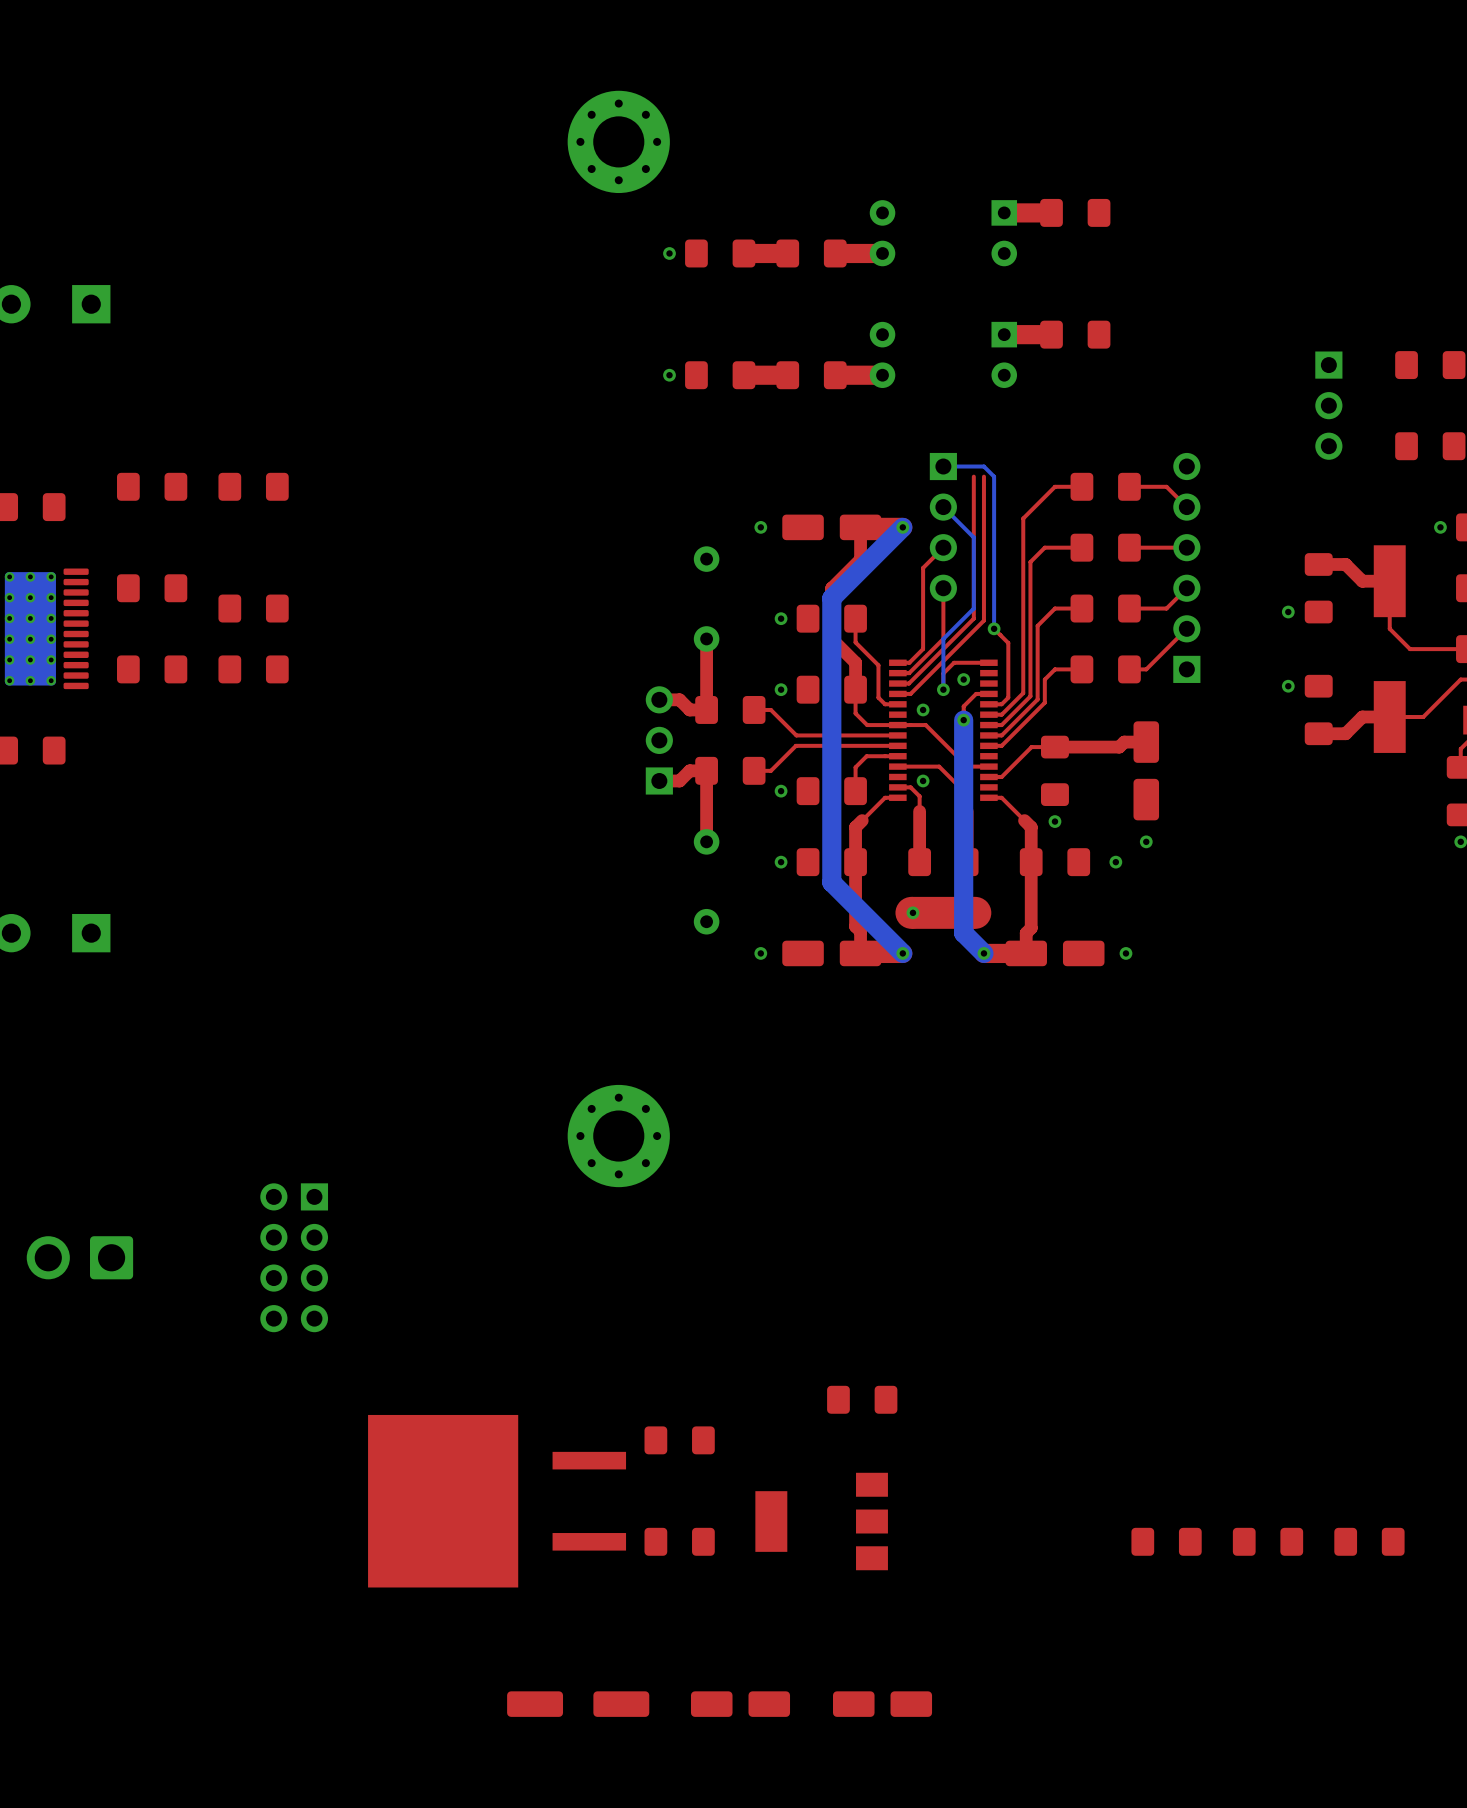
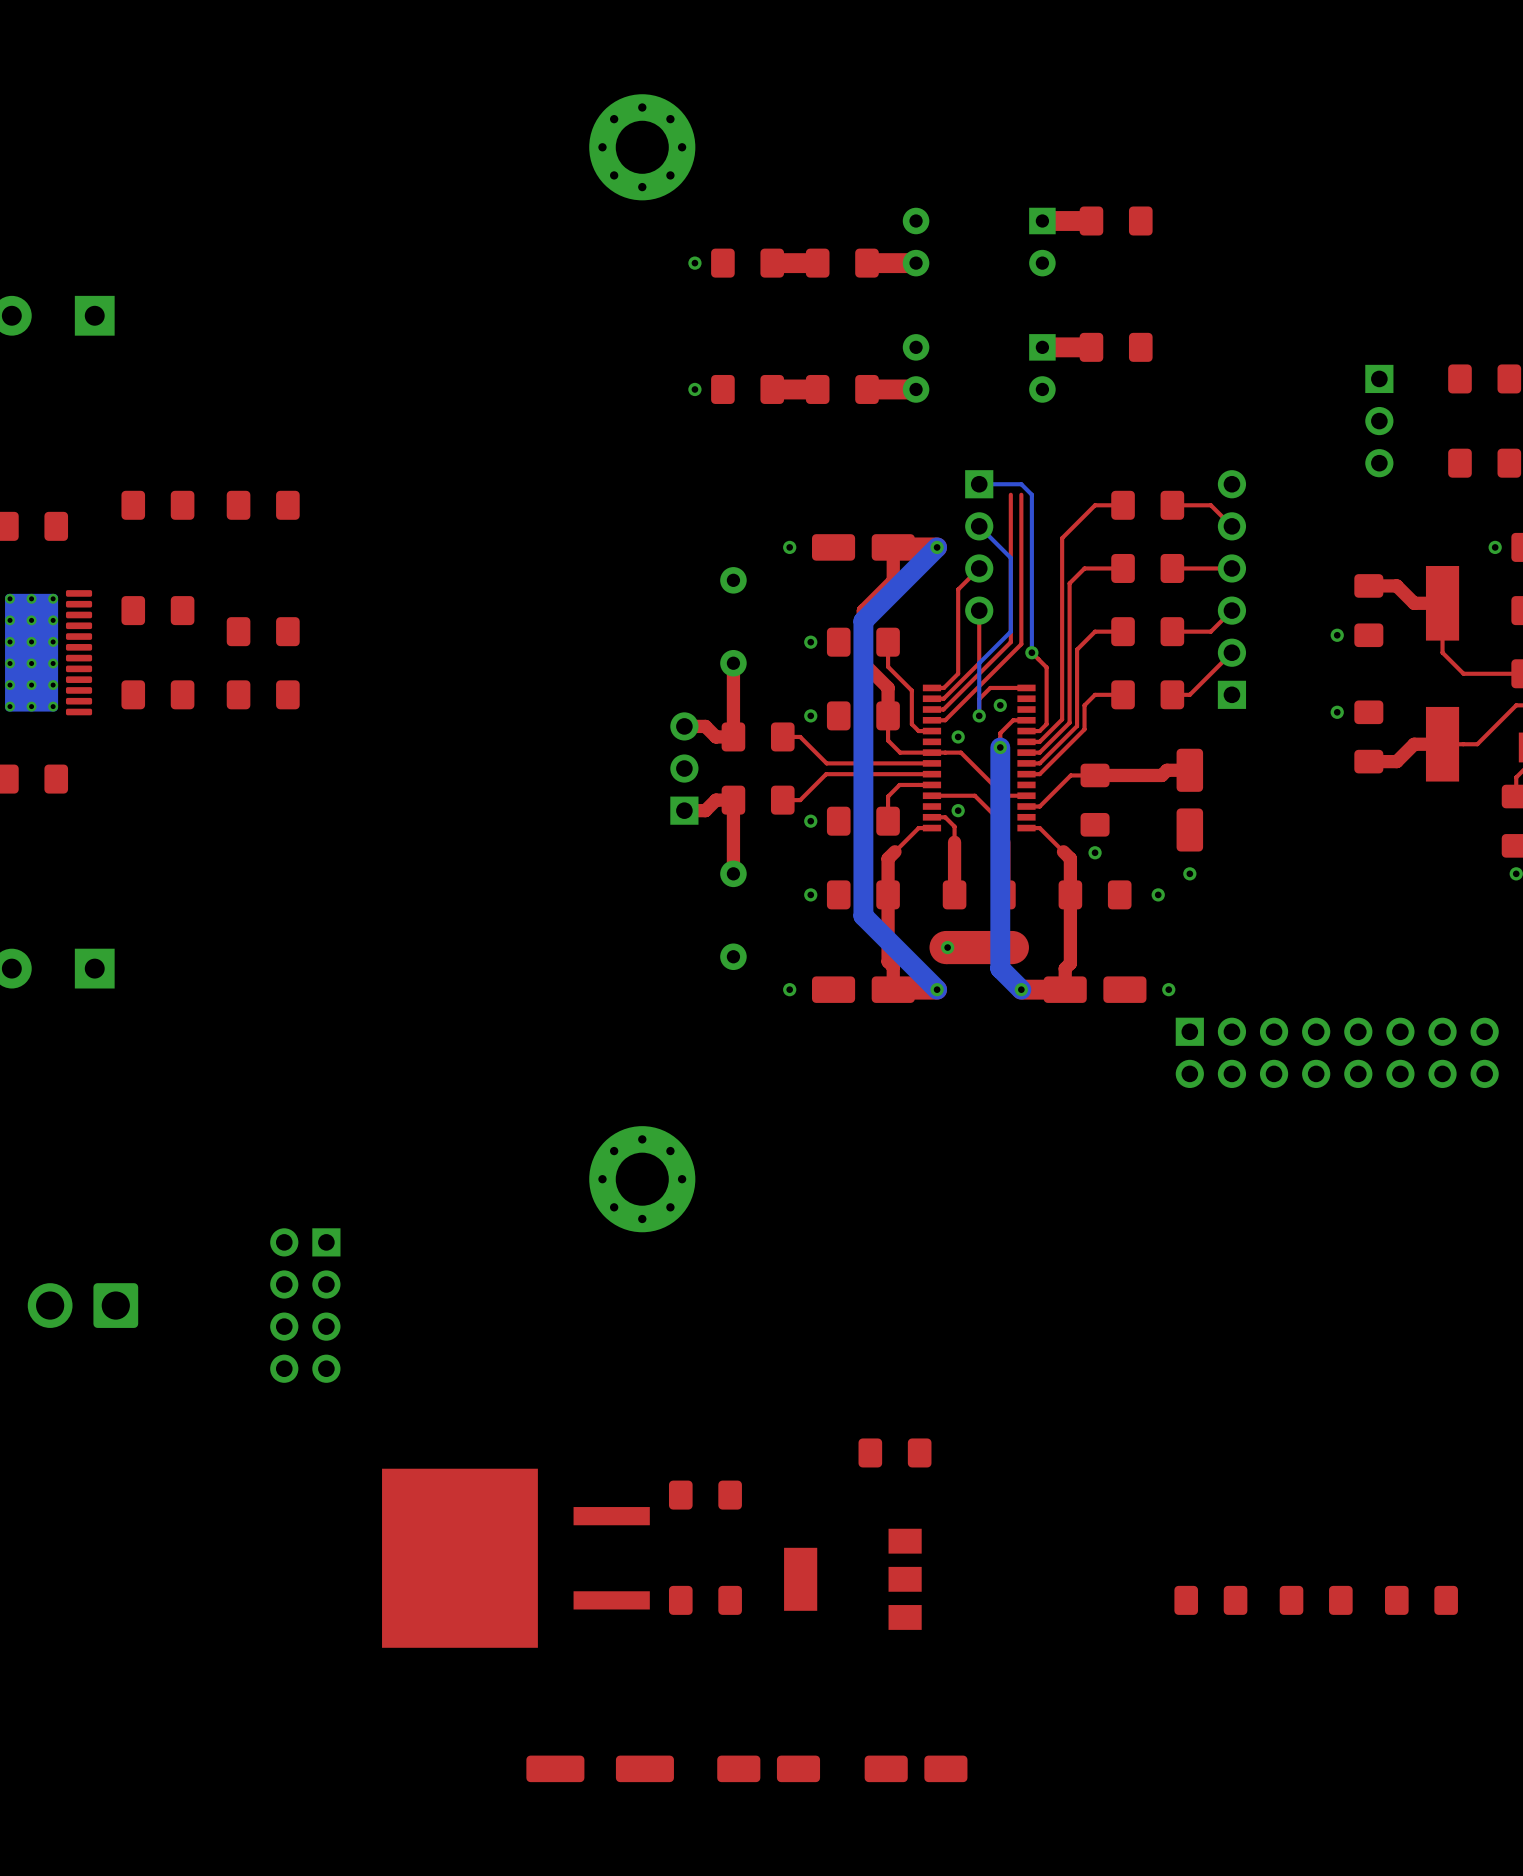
part: none -> (1337, 1052)

